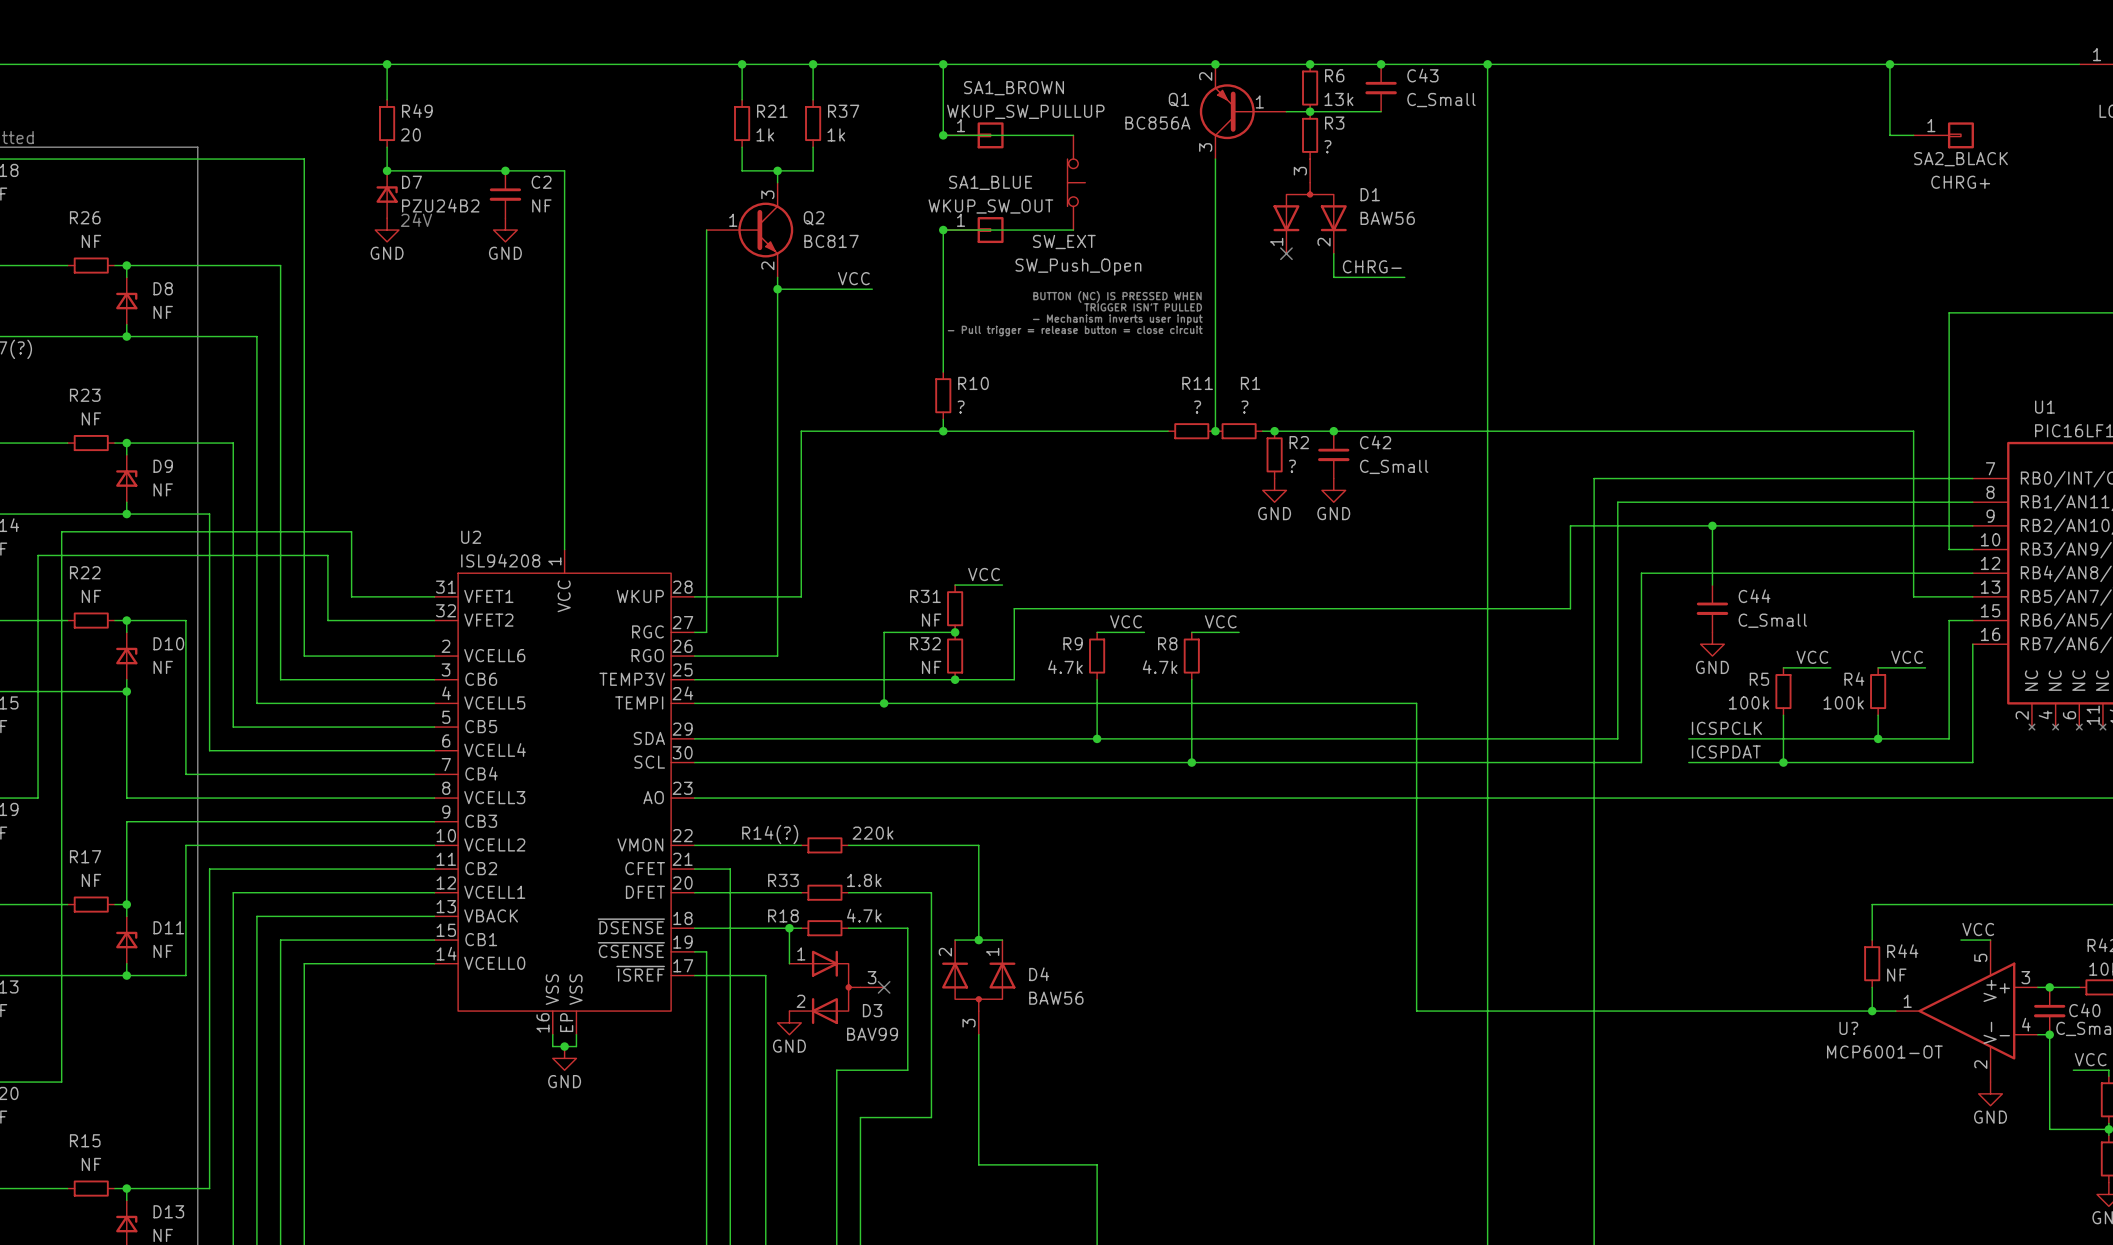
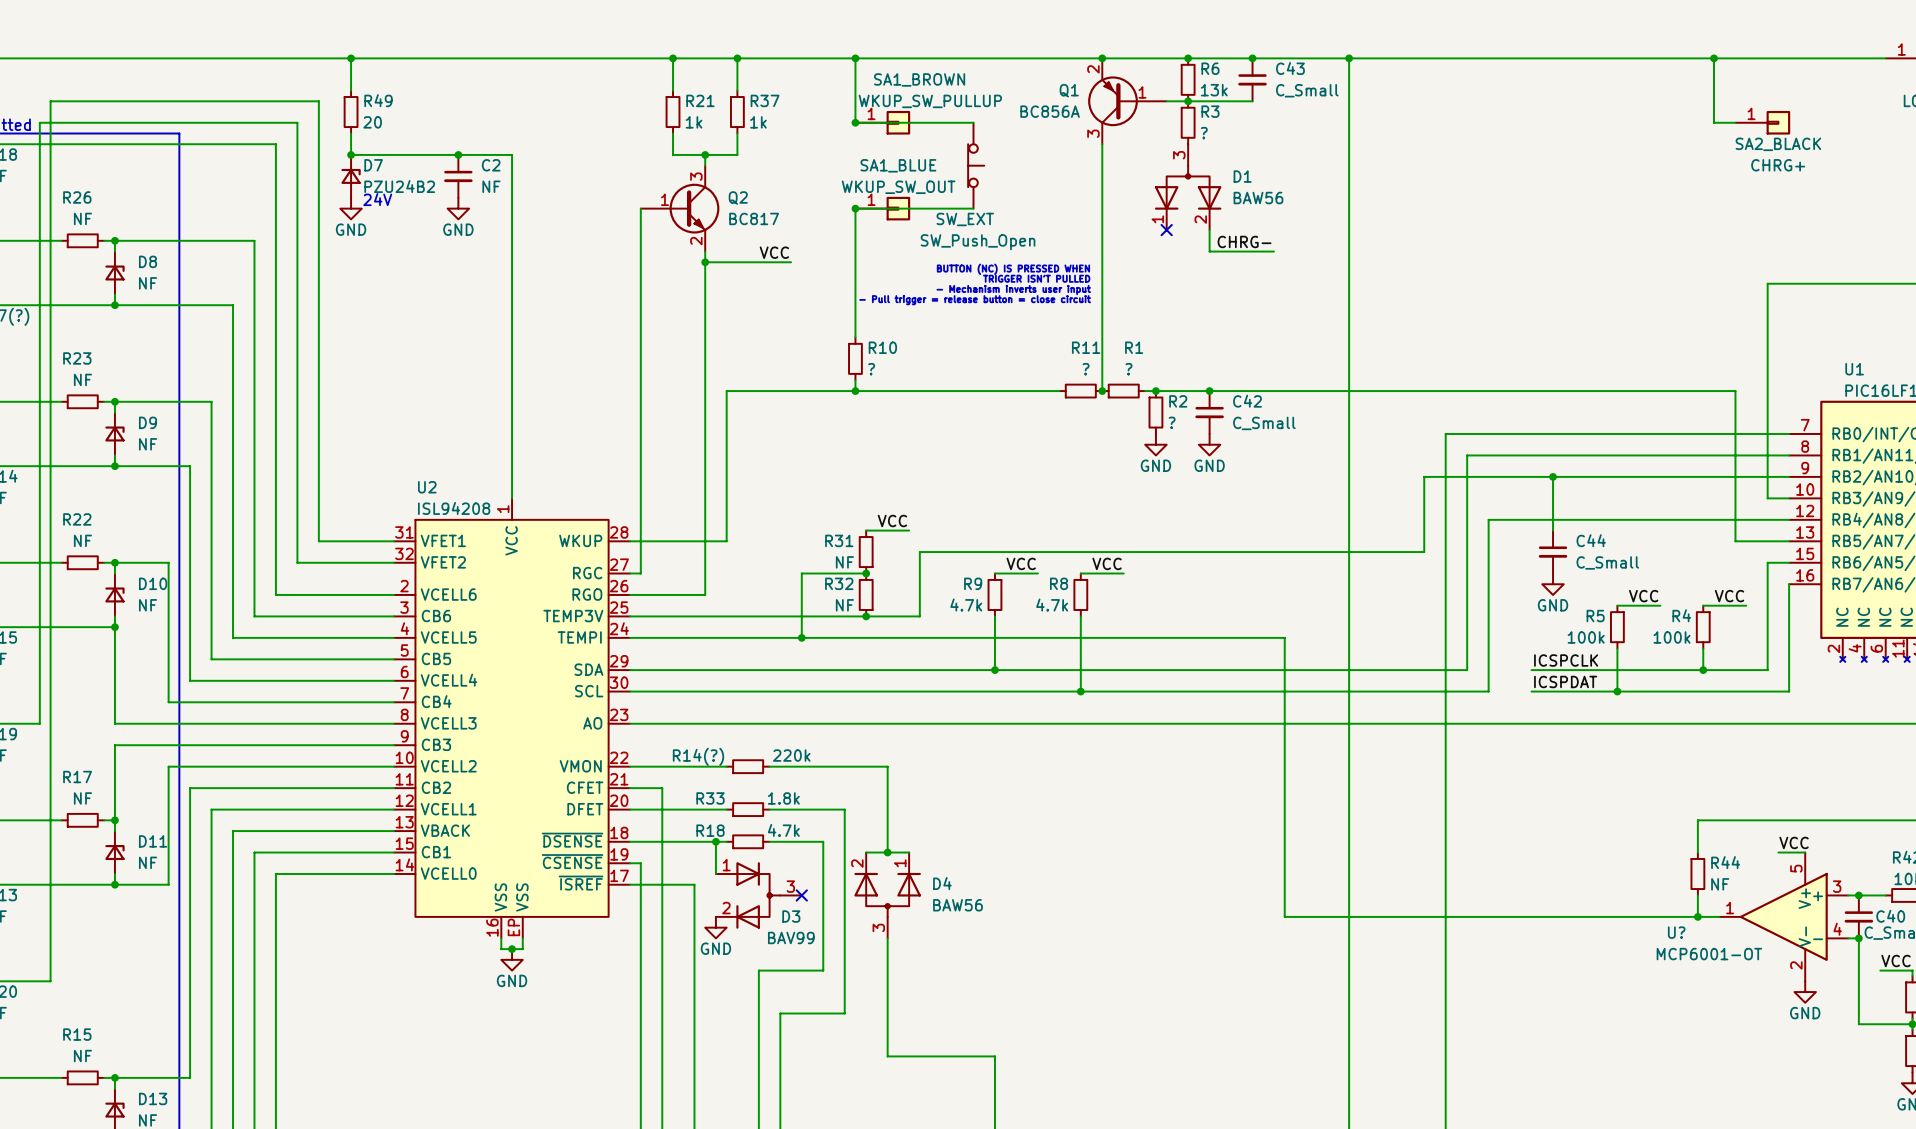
wire: (351, 531) (61, 531) (61, 1082) (55, 1082) -> (318, 482) (318, 101) (50, 101) (50, 981)
wire: (327, 555) (38, 555) (38, 798) -> (297, 503) (297, 122) (39, 122) (39, 723) (34, 723)

